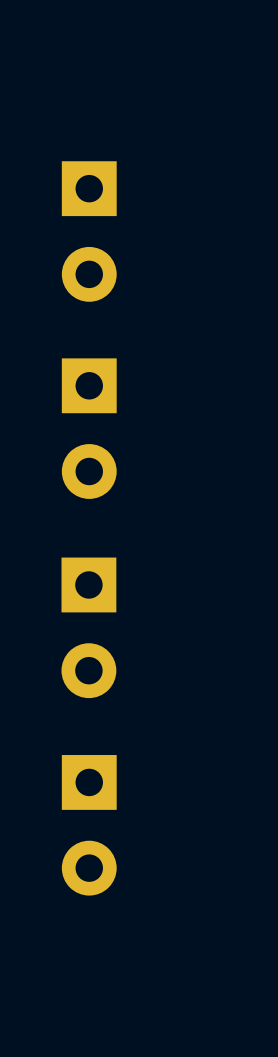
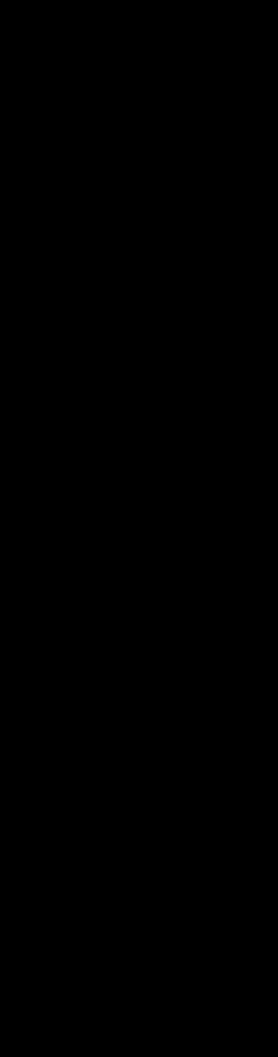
part: (89, 231) -> none
part: (89, 428) -> none
part: (88, 627) -> none
part: (89, 825) -> none

